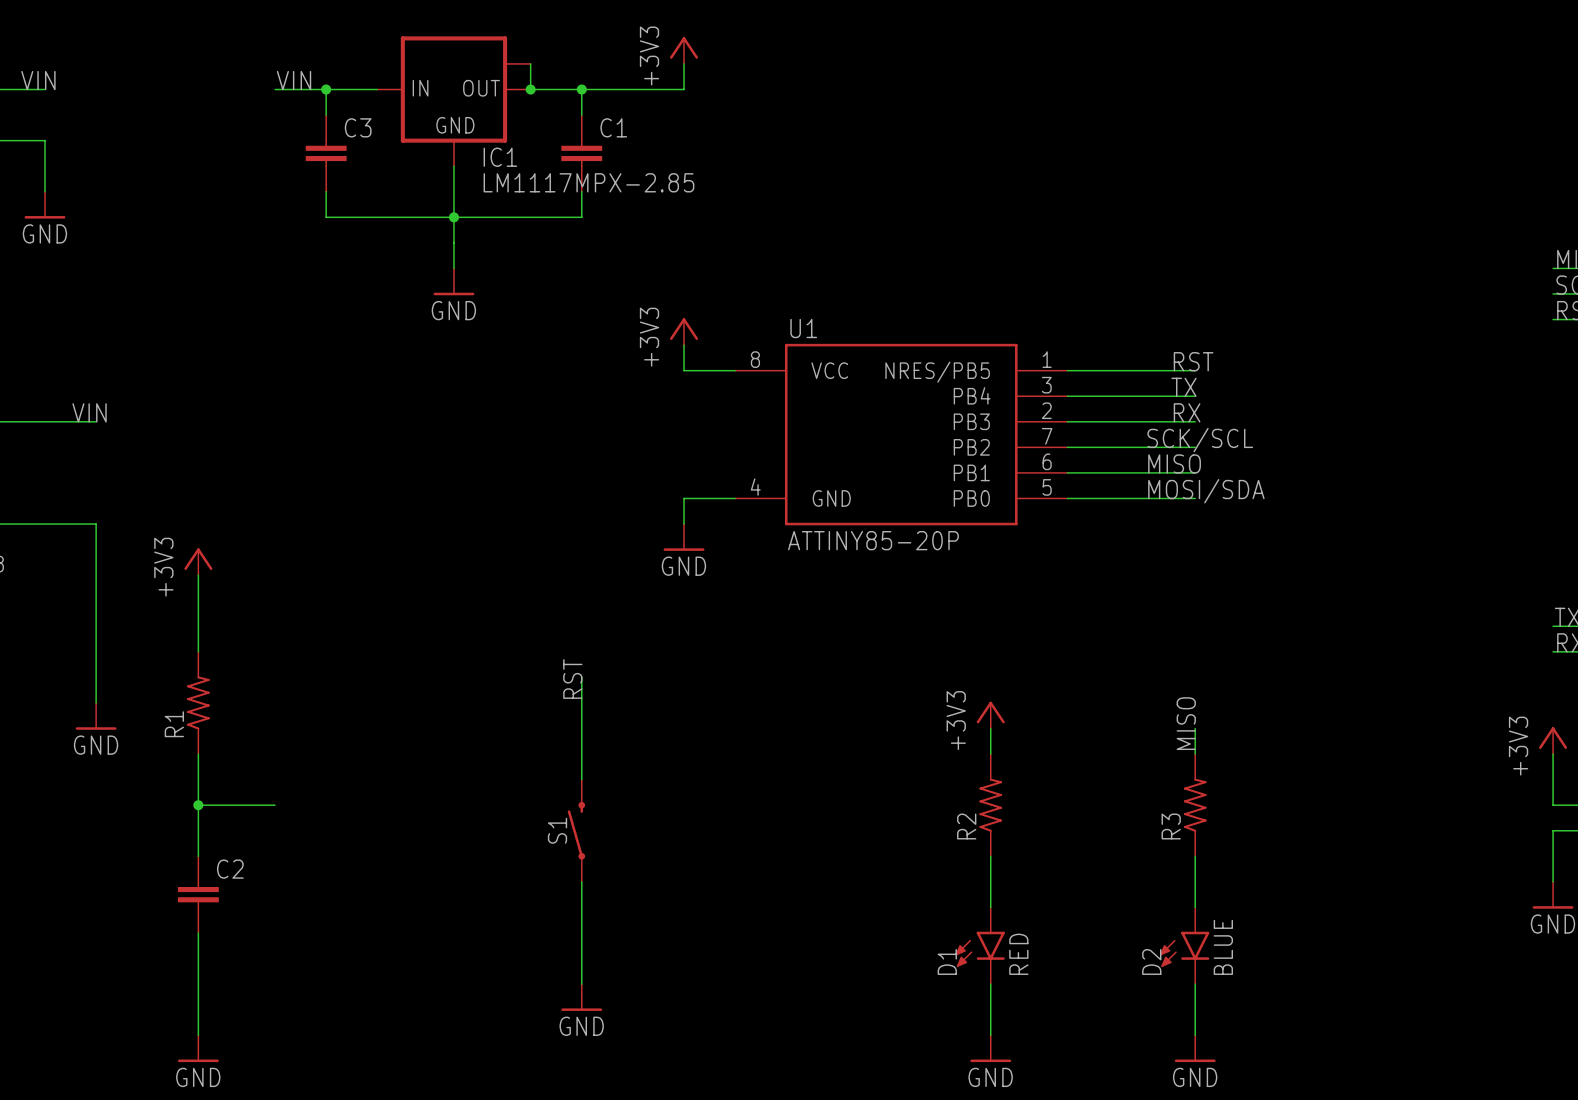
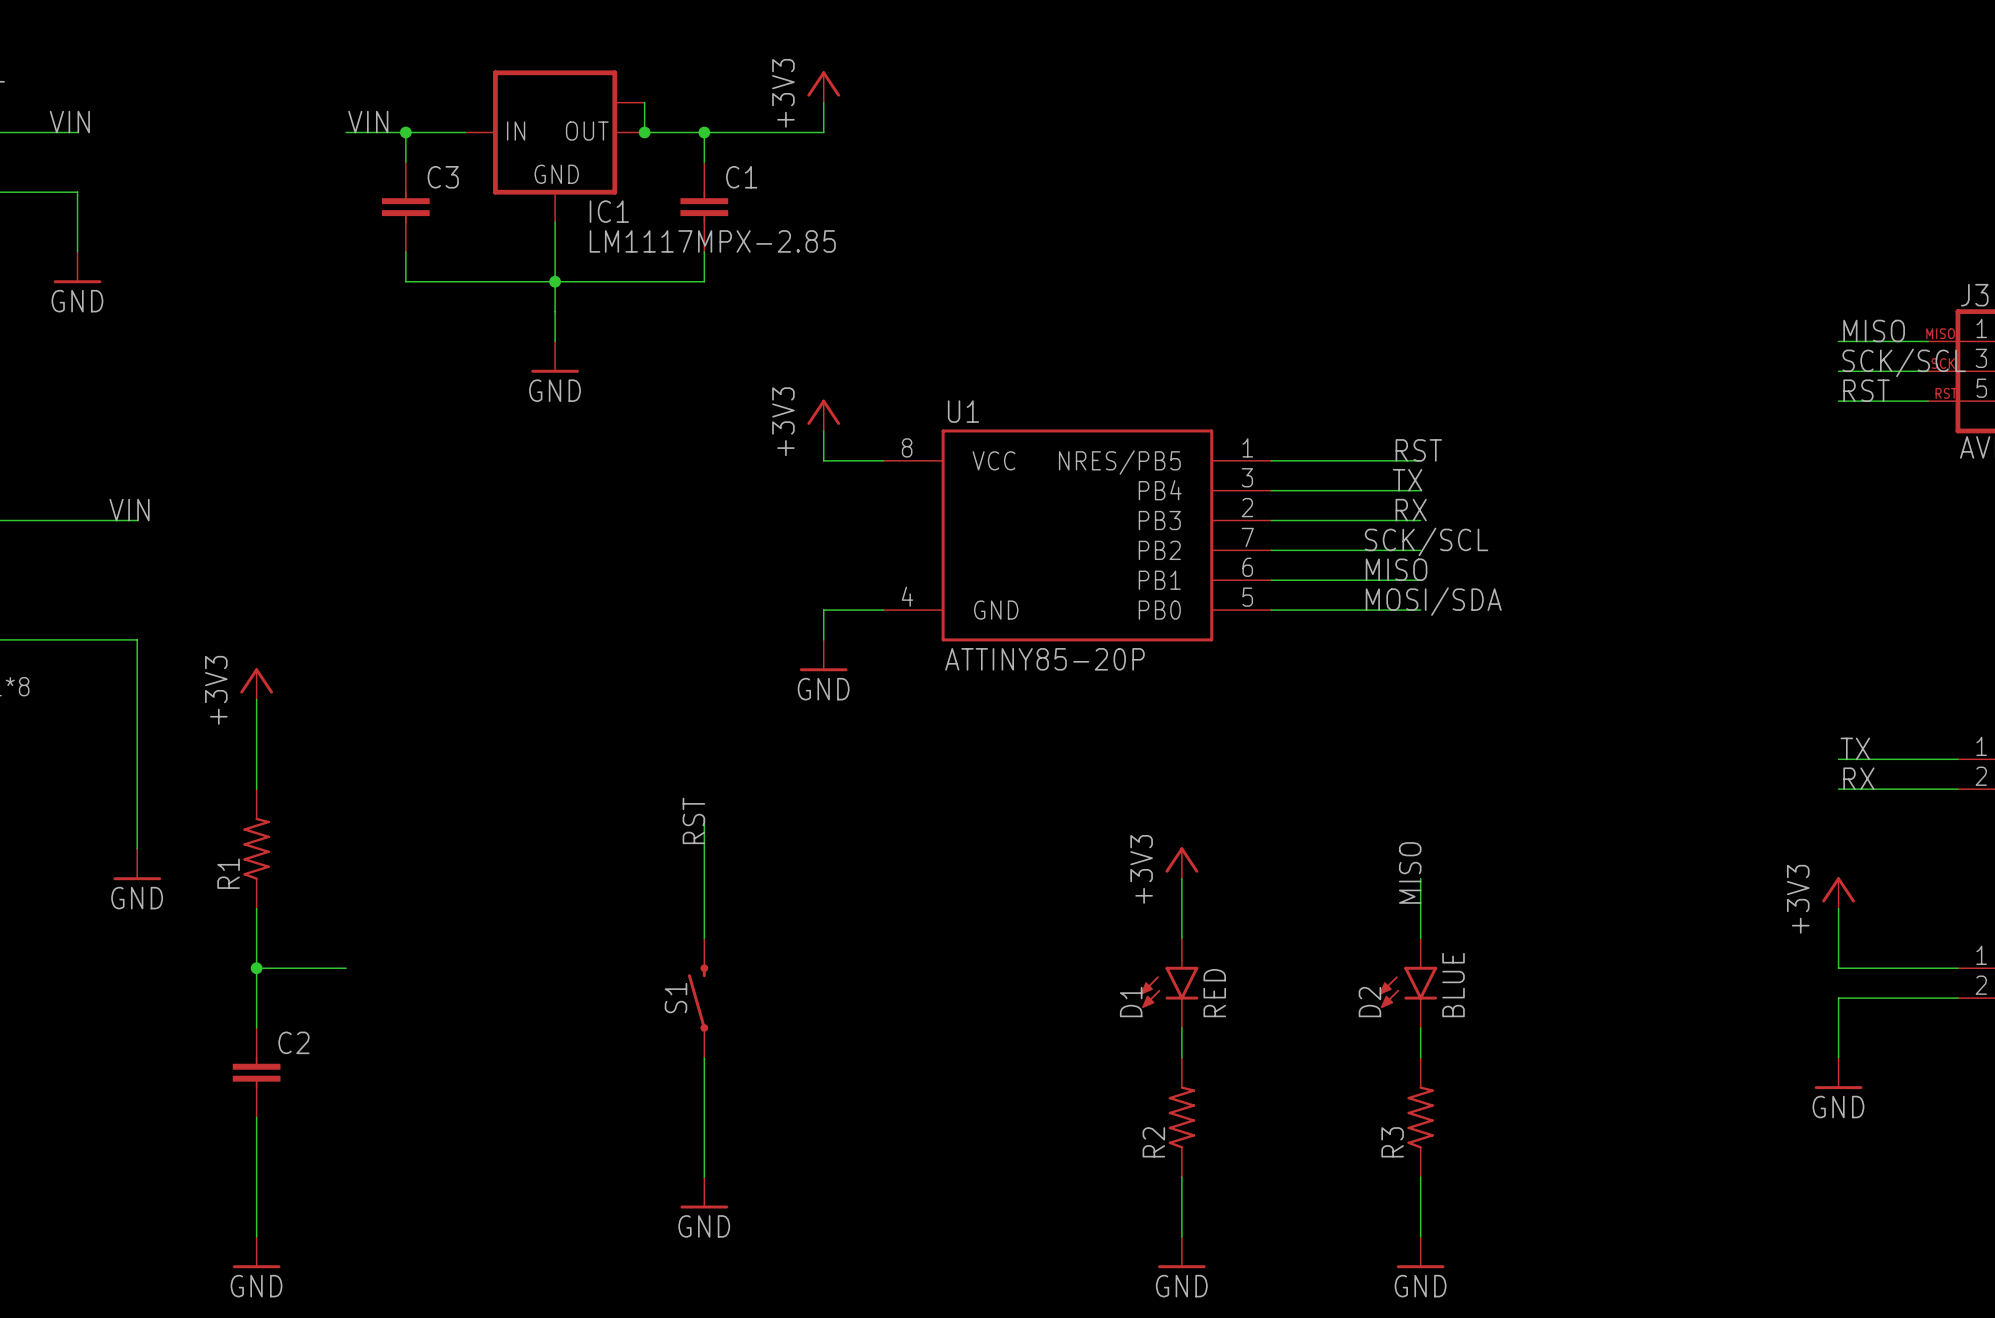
R2 position: (990, 805) -> (1181, 1117)
R3 position: (1195, 805) -> (1420, 1117)
D1 position: (980, 945) -> (1169, 983)
D2 position: (1184, 945) -> (1408, 983)

